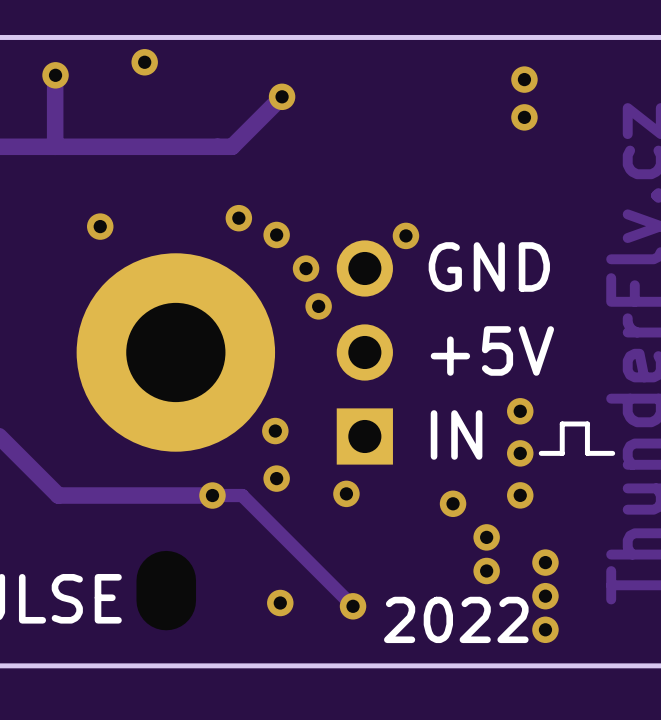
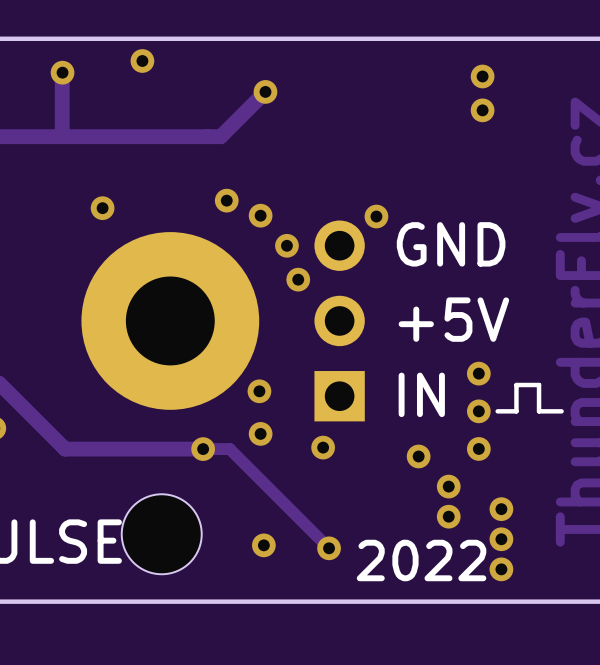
part footprint: [136, 550, 197, 631] -> [121, 494, 202, 575]

